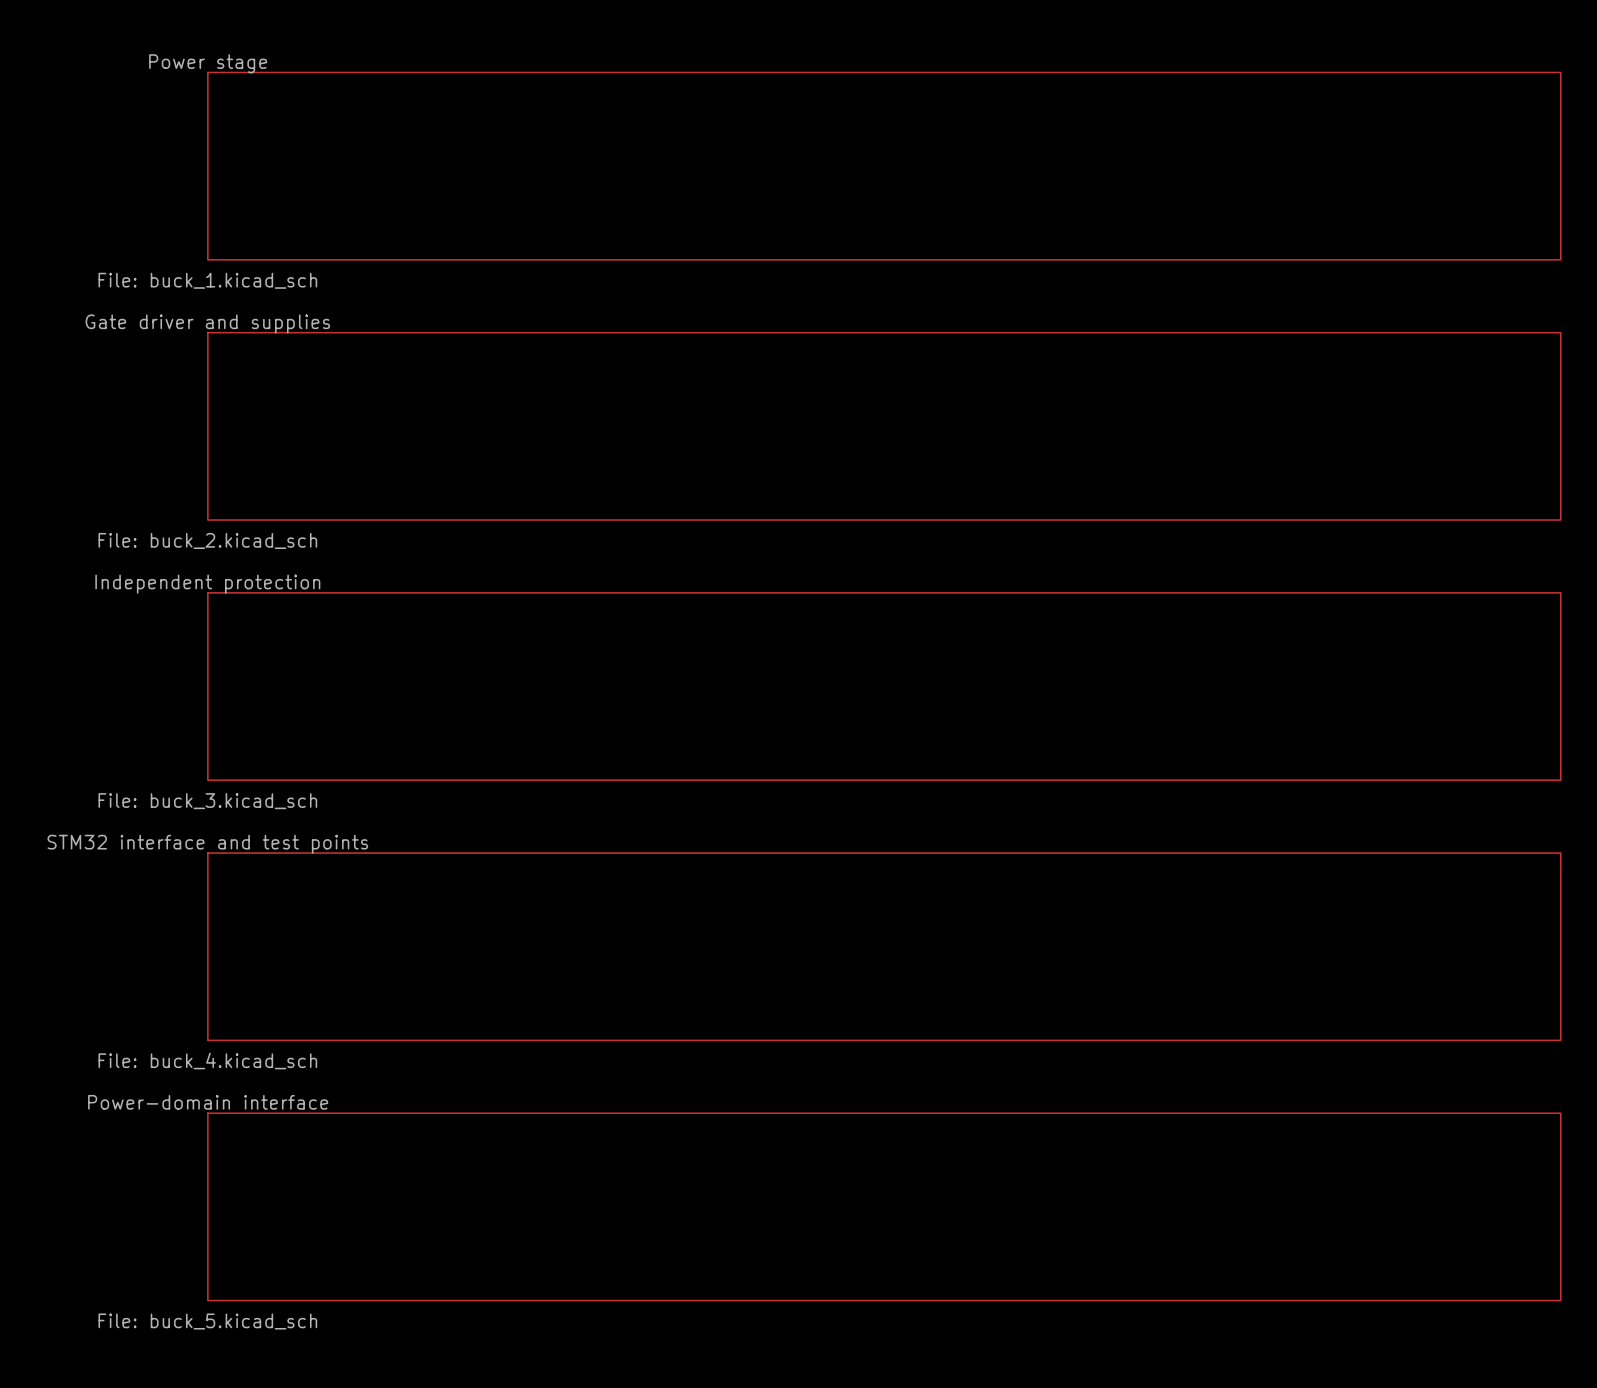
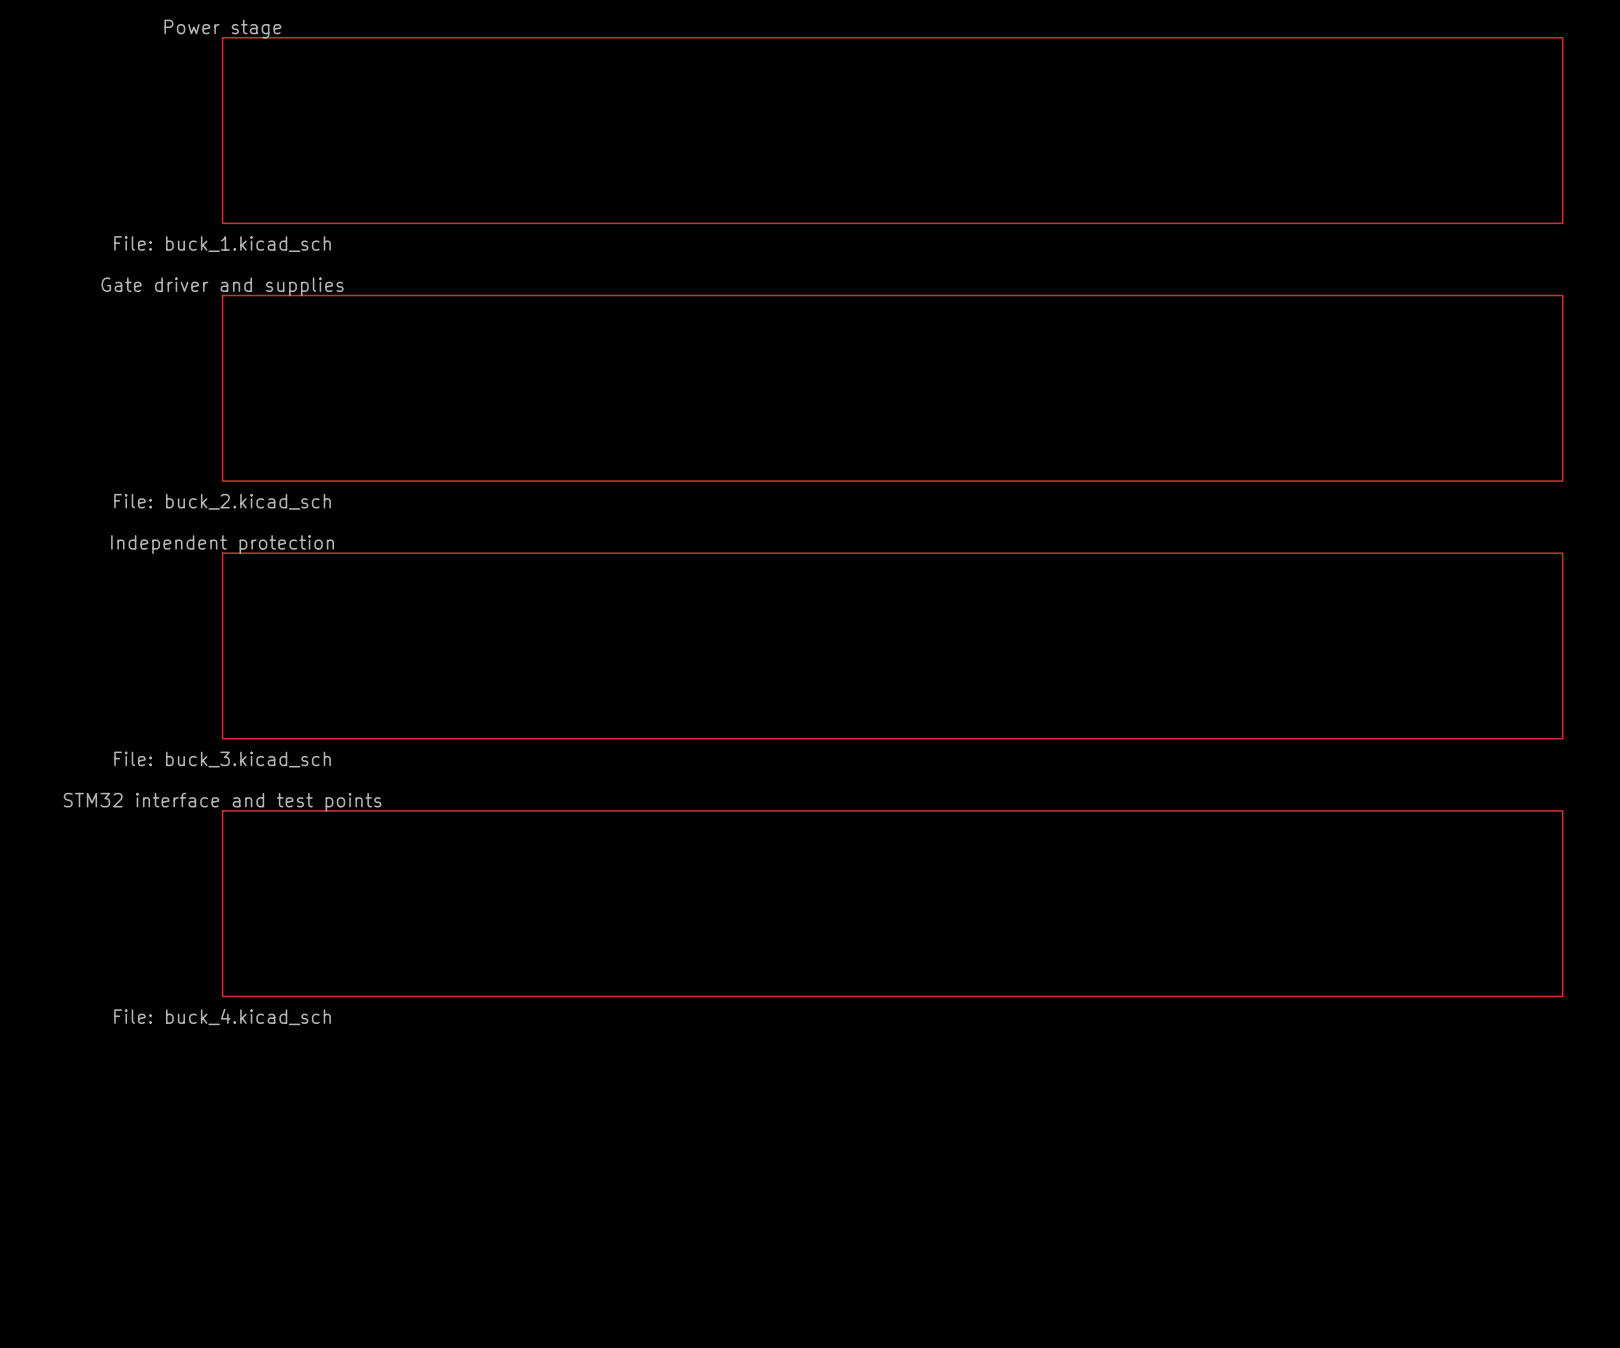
sheet Power-domain interface: File: buck_5.kicad_sch (884, 1206) -> none

